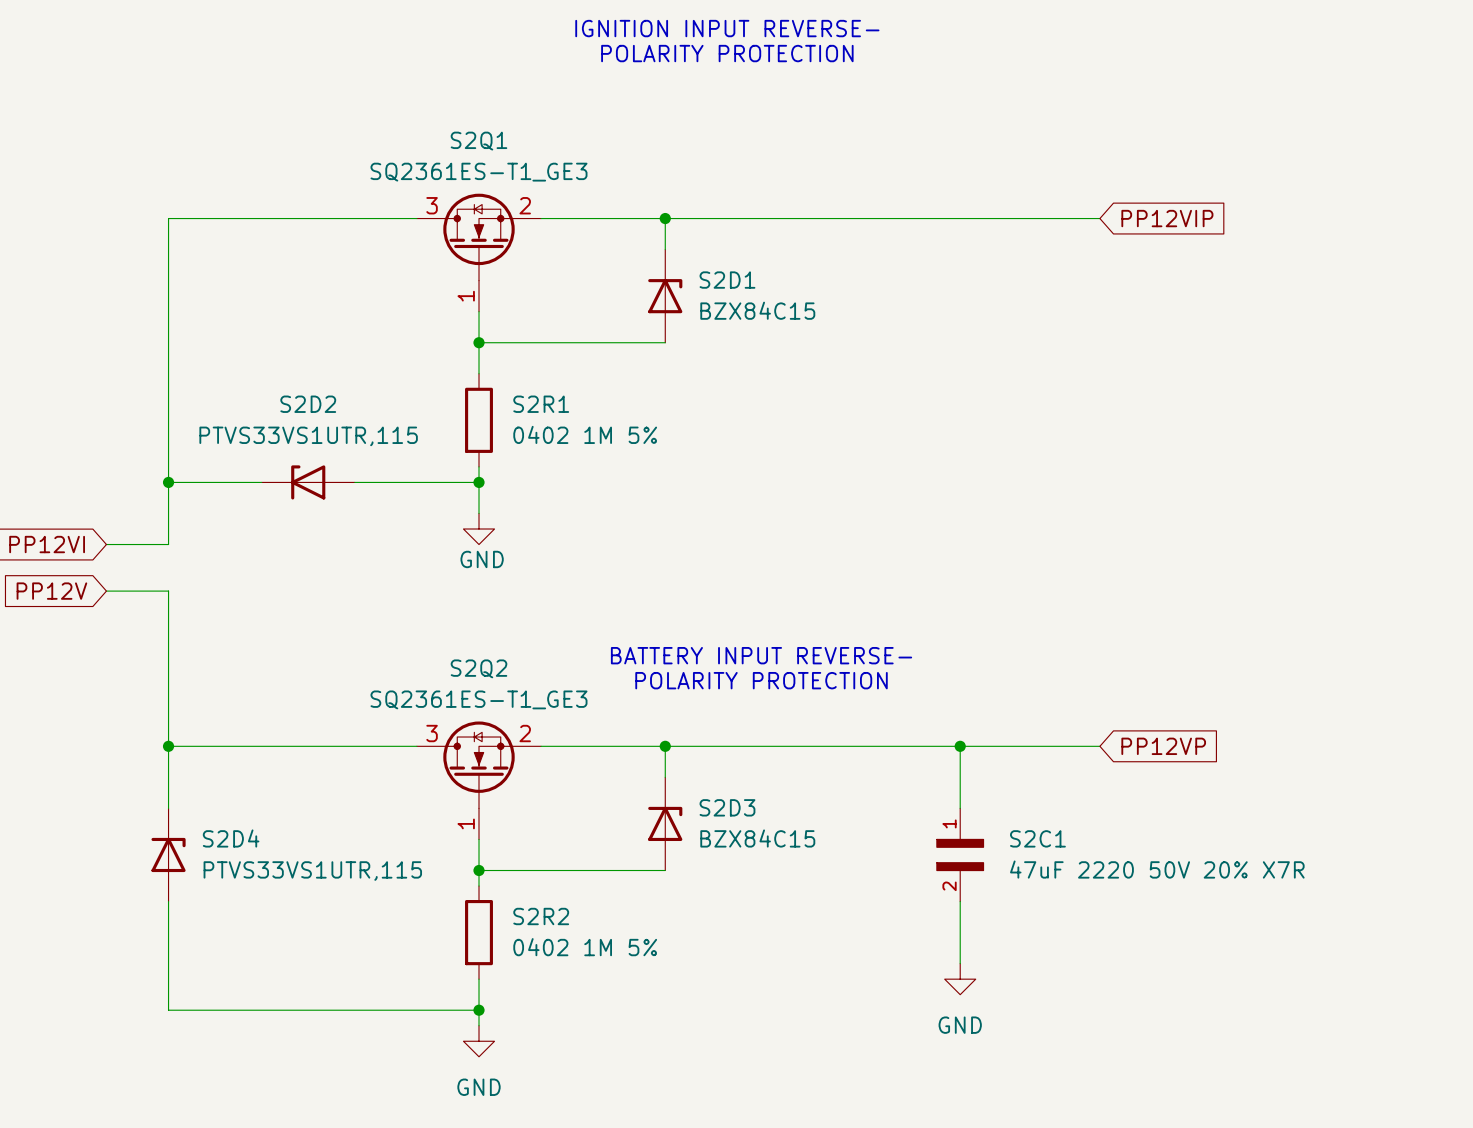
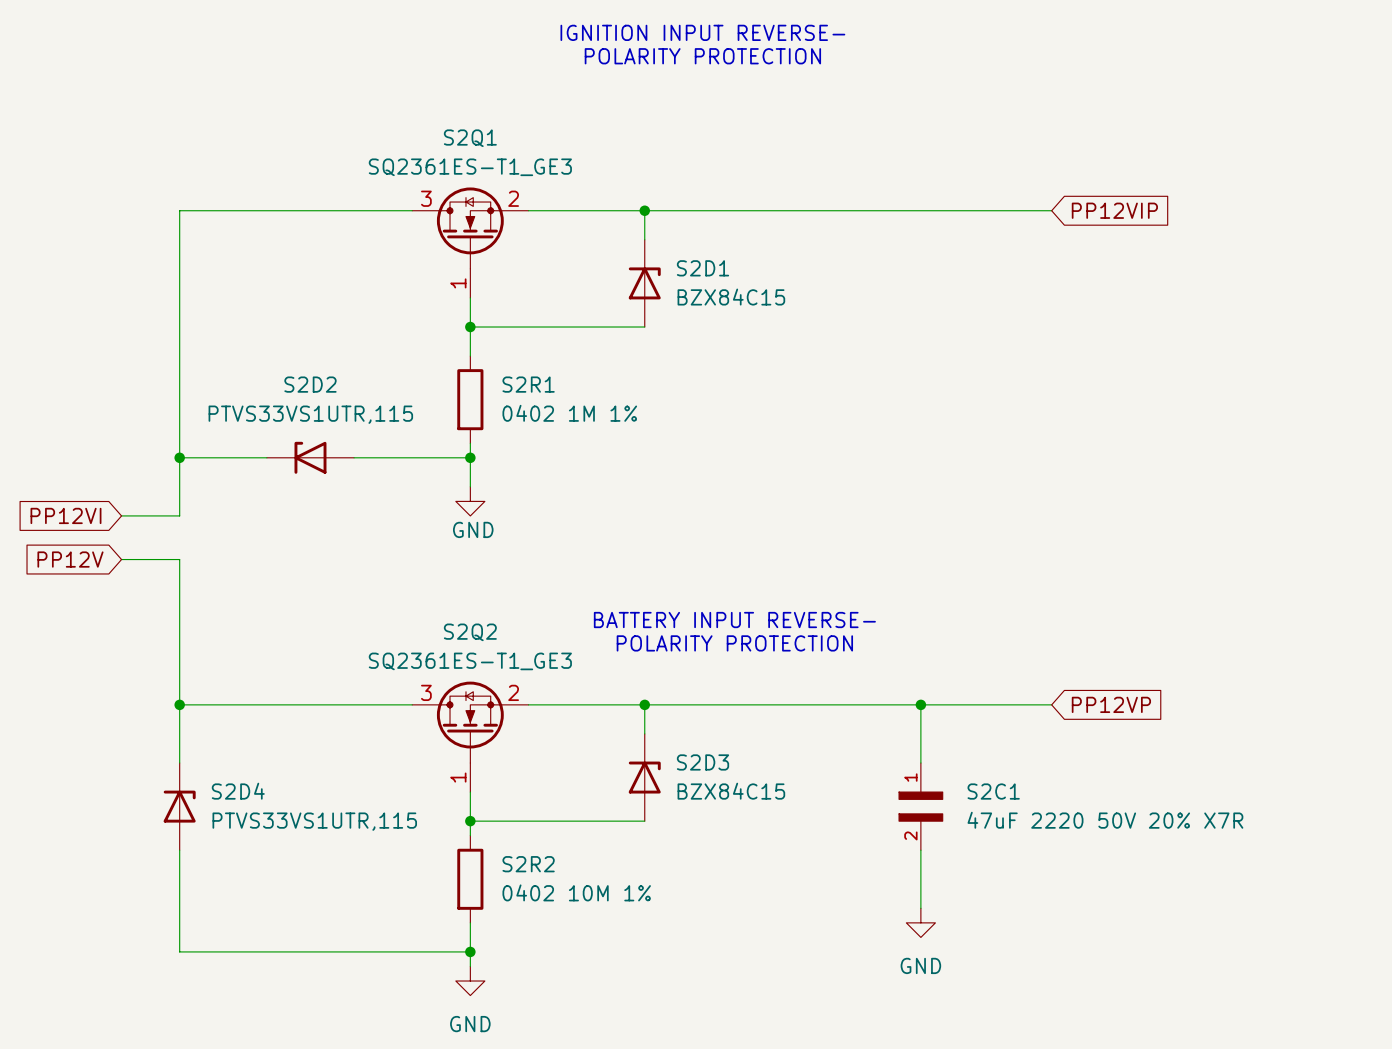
S2R1 value: 0402 1M 5% (585, 434) -> 0402 1M 1% (569, 413)
S2R2 value: 0402 1M 5% (585, 947) -> 0402 10M 1% (576, 892)

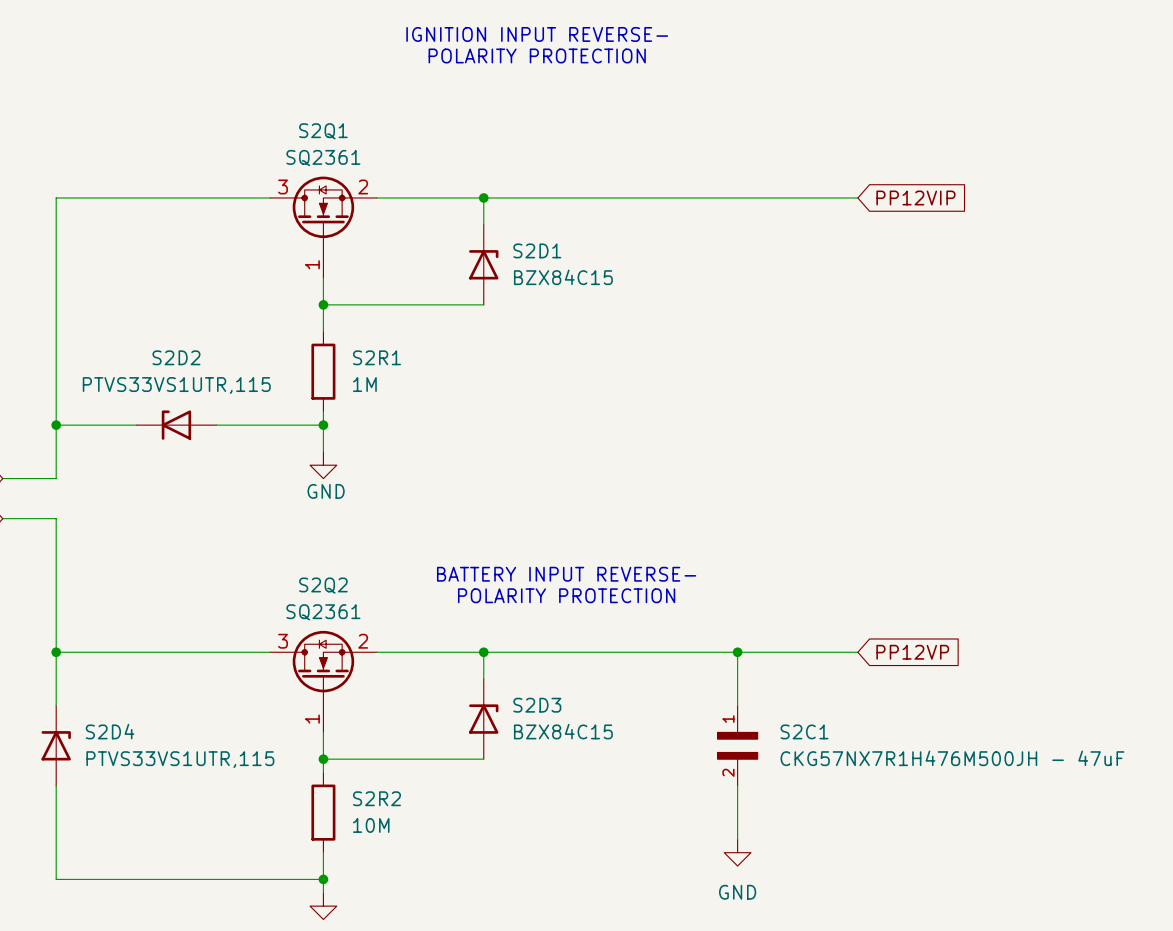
S2Q1 value: SQ2361ES-T1_GE3 (470, 167) -> SQ2361 (323, 158)
S2R1 value: 0402 1M 1% (569, 413) -> 1M (364, 384)
S2Q2 value: SQ2361ES-T1_GE3 (470, 661) -> SQ2361 (323, 612)
S2C1 value: 47uF 2220 50V 20% X7R (1105, 820) -> CKG57NX7R1H476M500JH - 47uF (952, 758)
S2R2 value: 0402 10M 1% (576, 892) -> 10M (371, 825)

